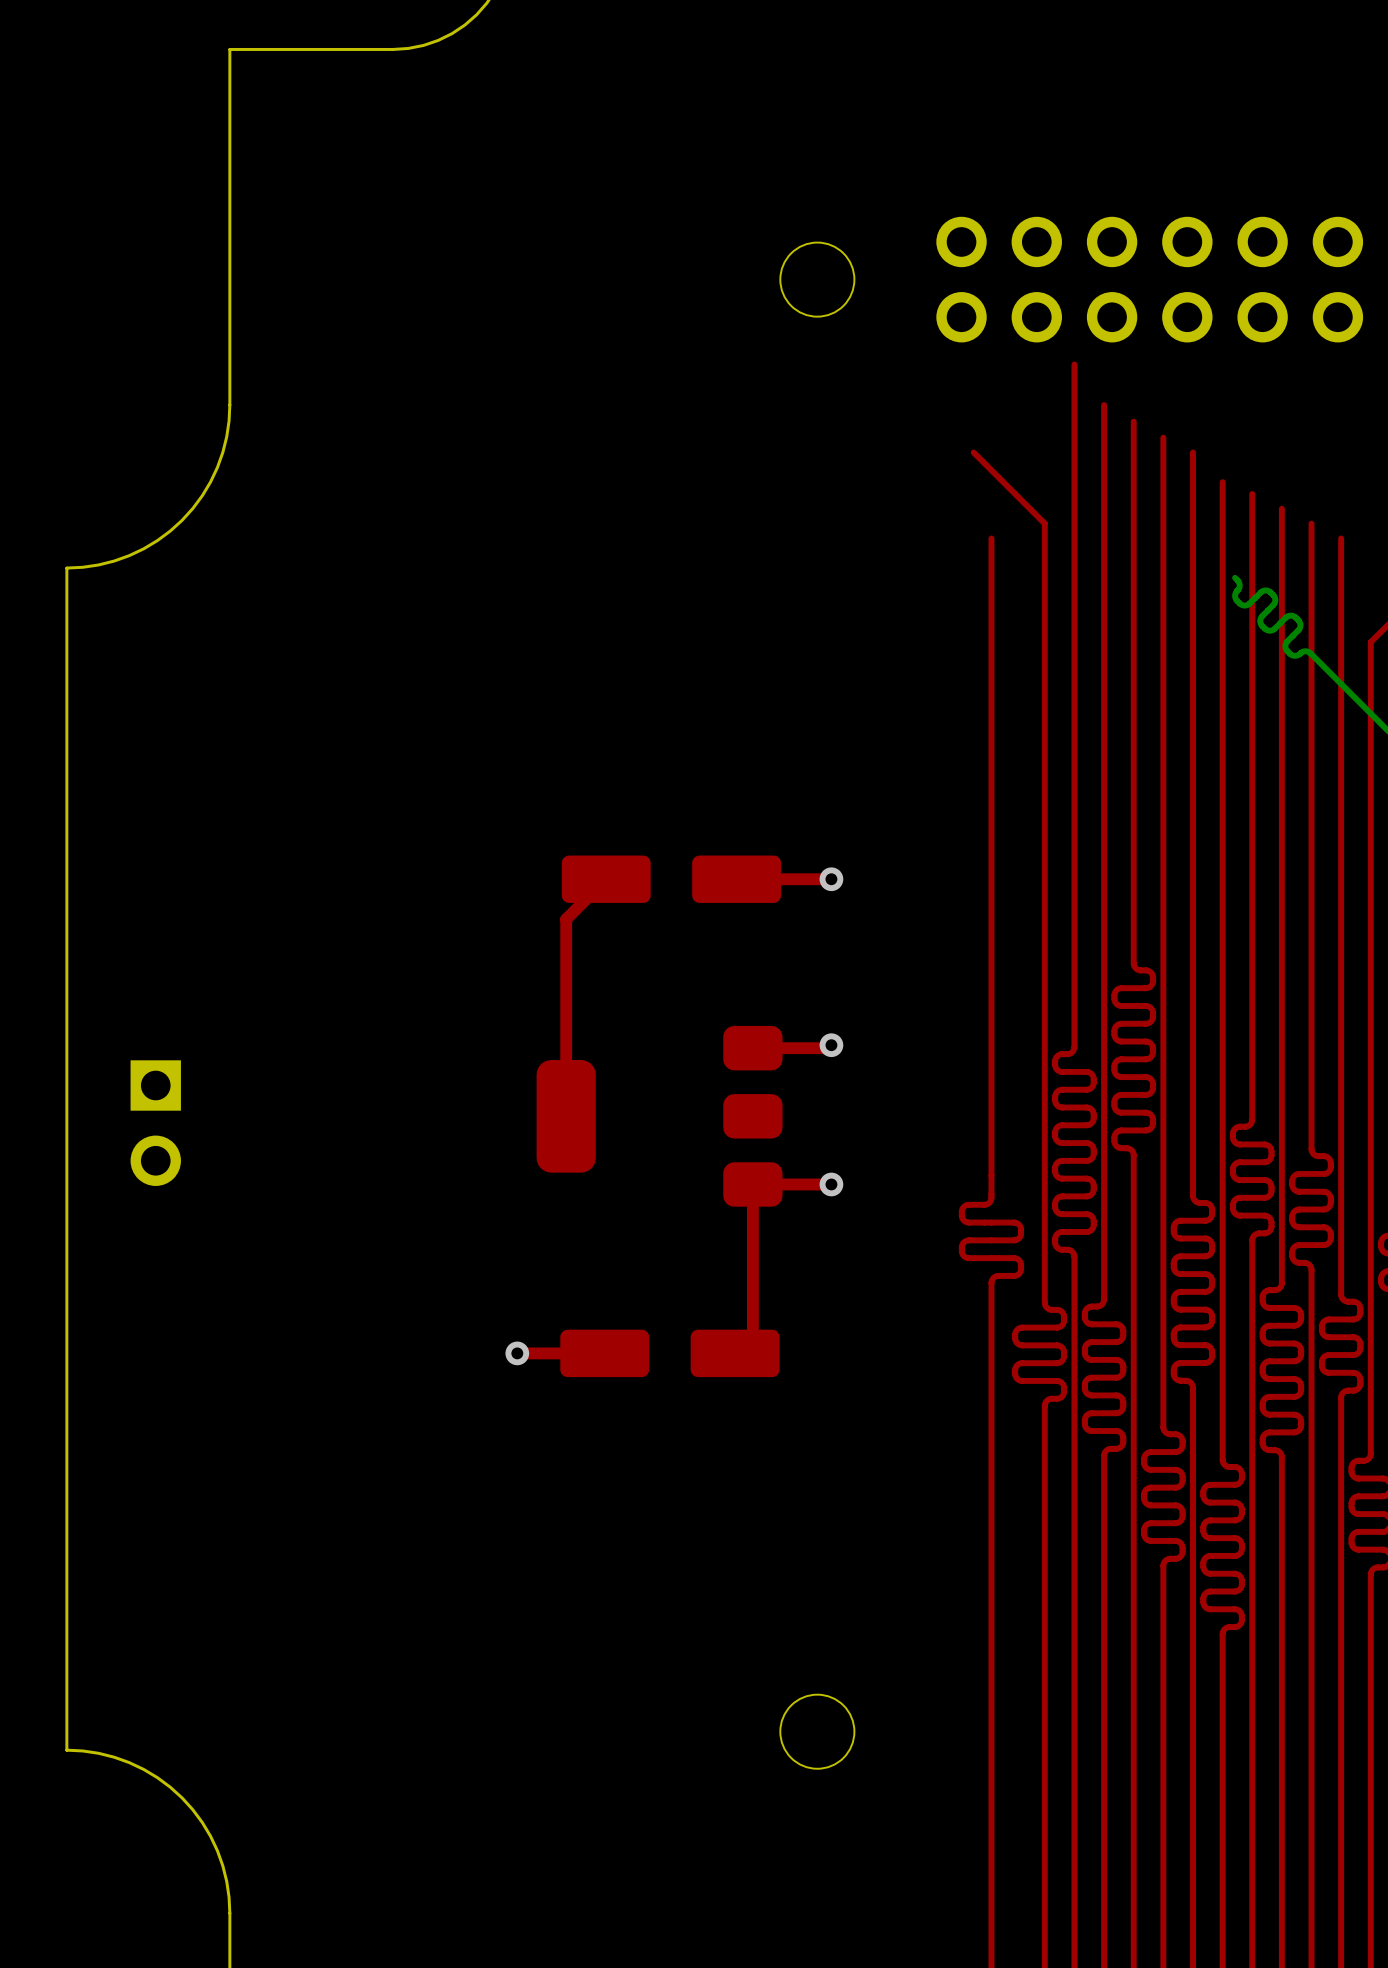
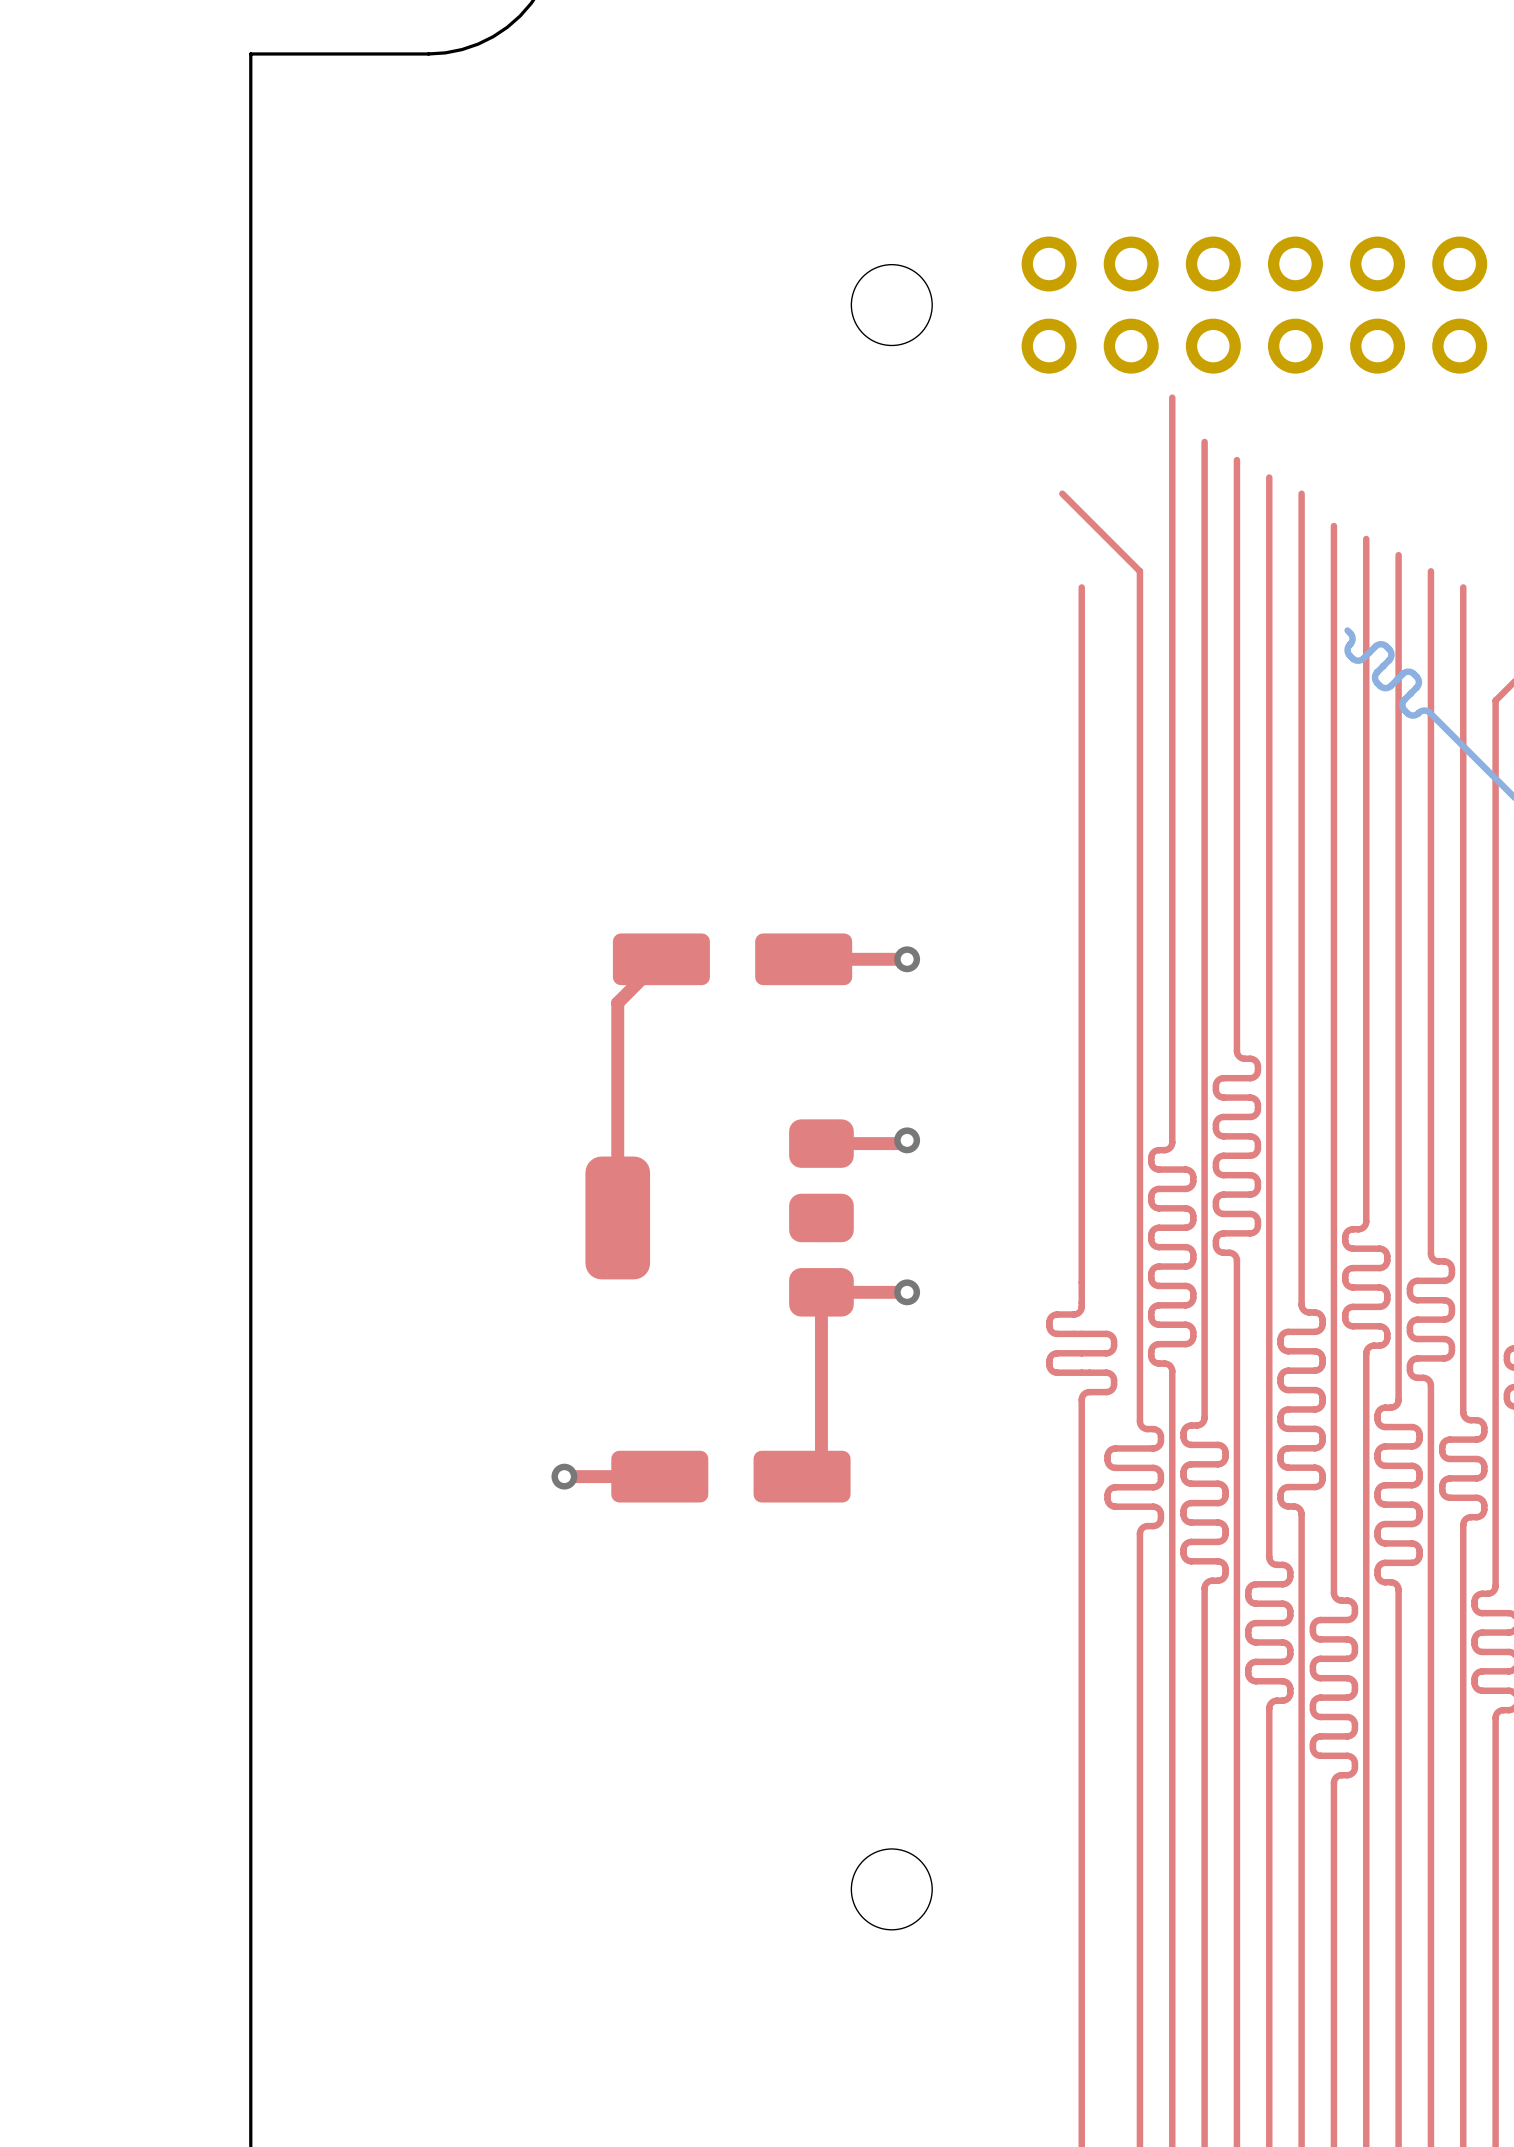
board edge: (229, 405) (226, 436) (217, 467) (202, 495) (182, 520) (157, 540) (129, 555) (98, 564) (66, 568) (66, 1750) (98, 1753) (129, 1762) (157, 1777) (182, 1797) (202, 1822) (217, 1850) (226, 1881) (229, 1913) -> (250, 441) (250, 2087)
part: (155, 1123) -> none

